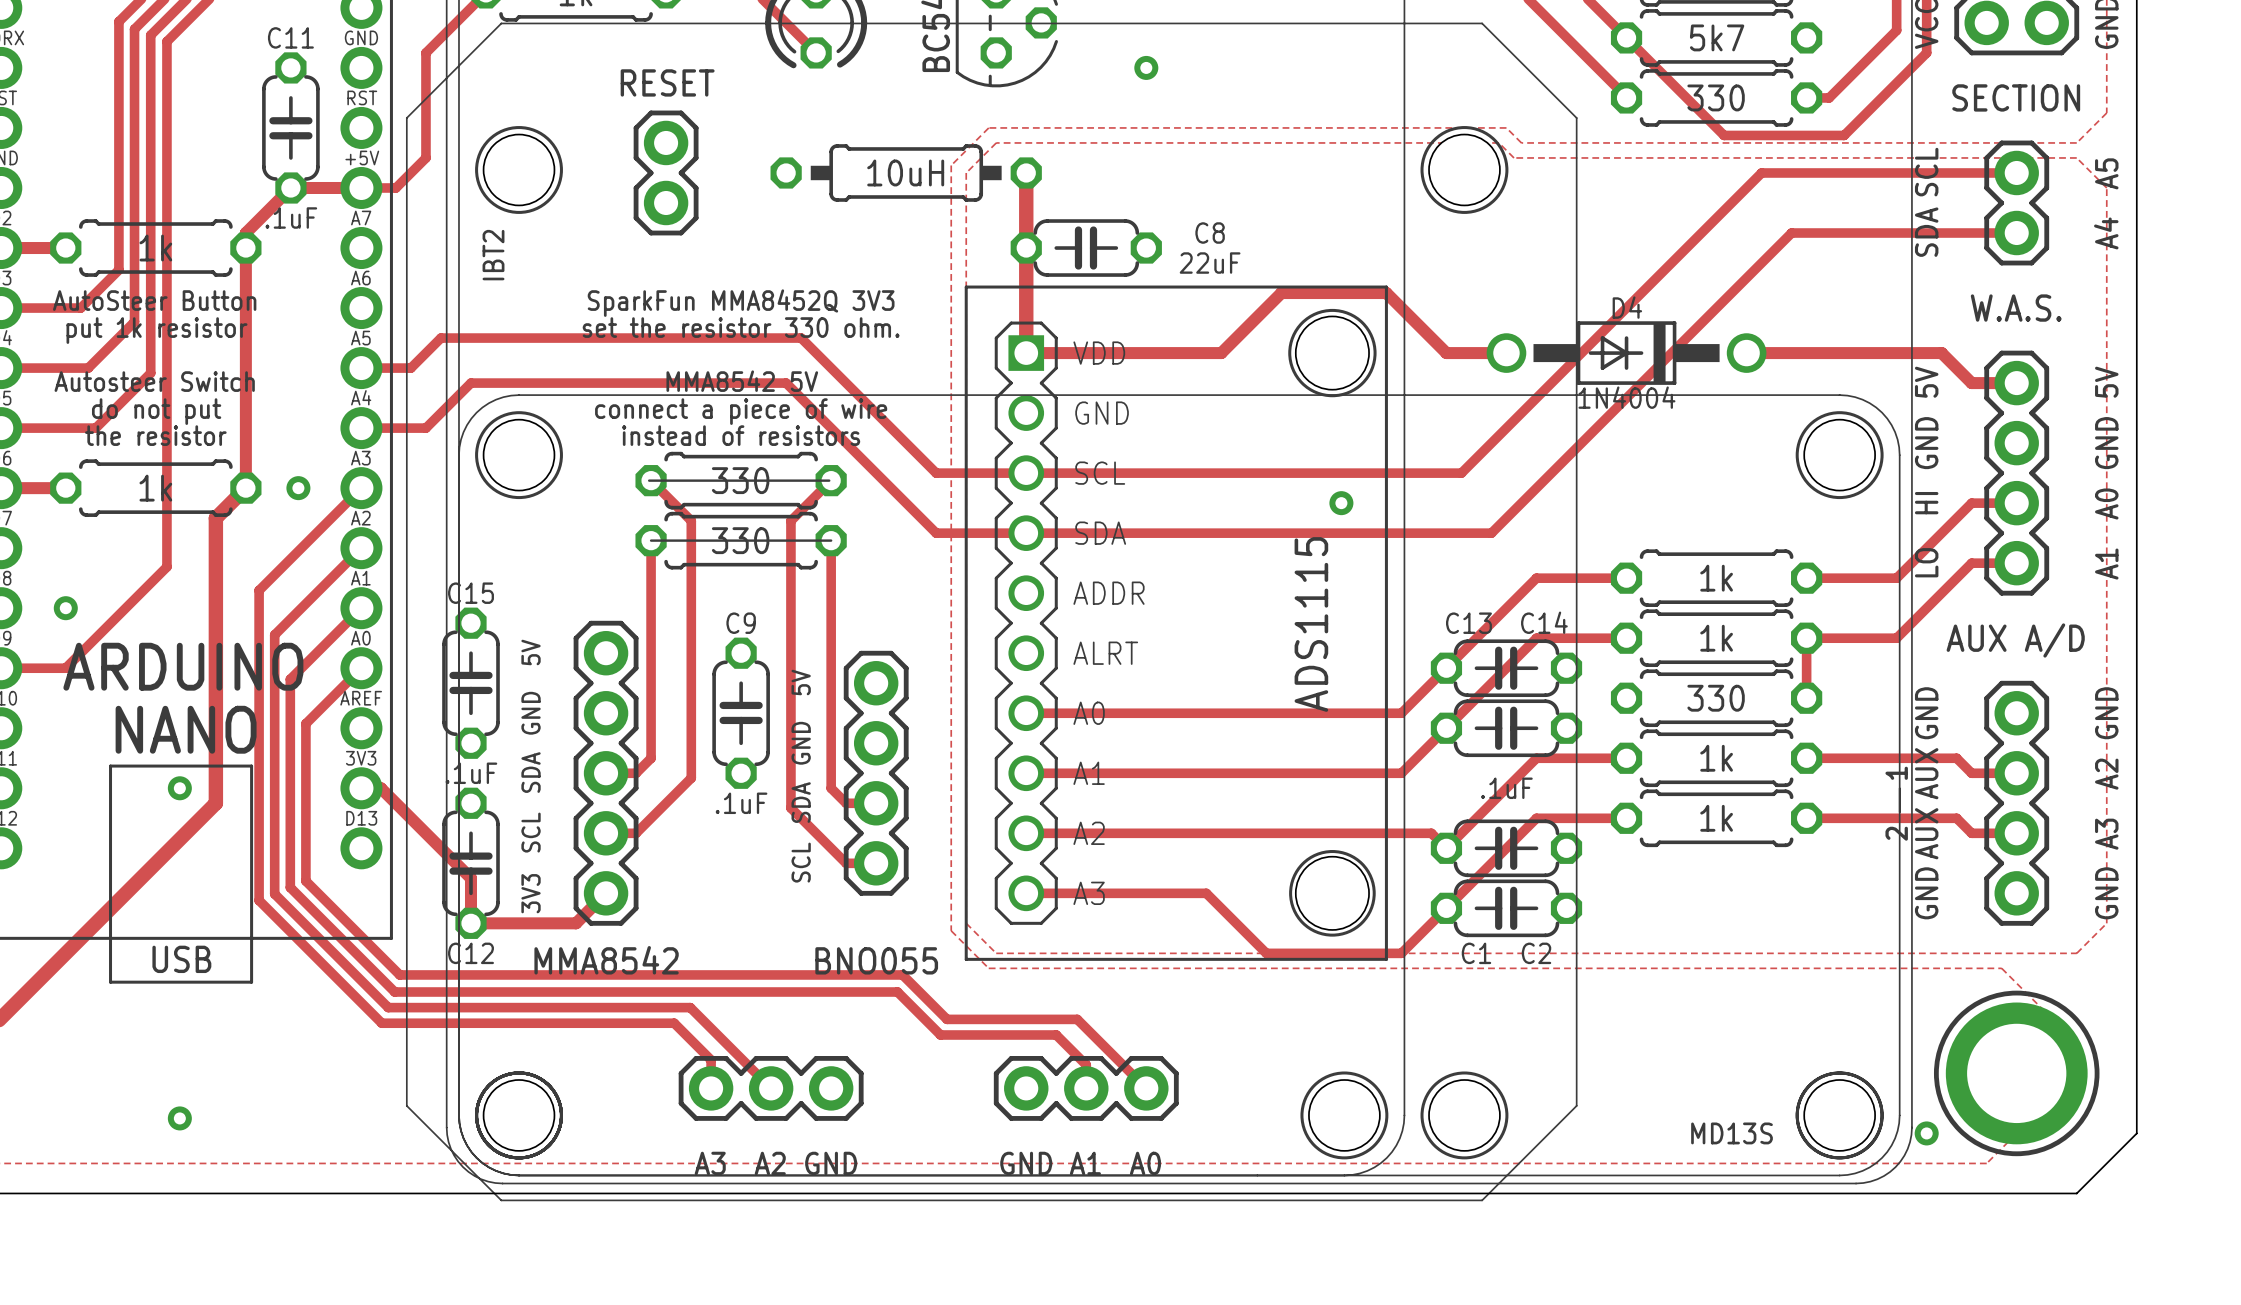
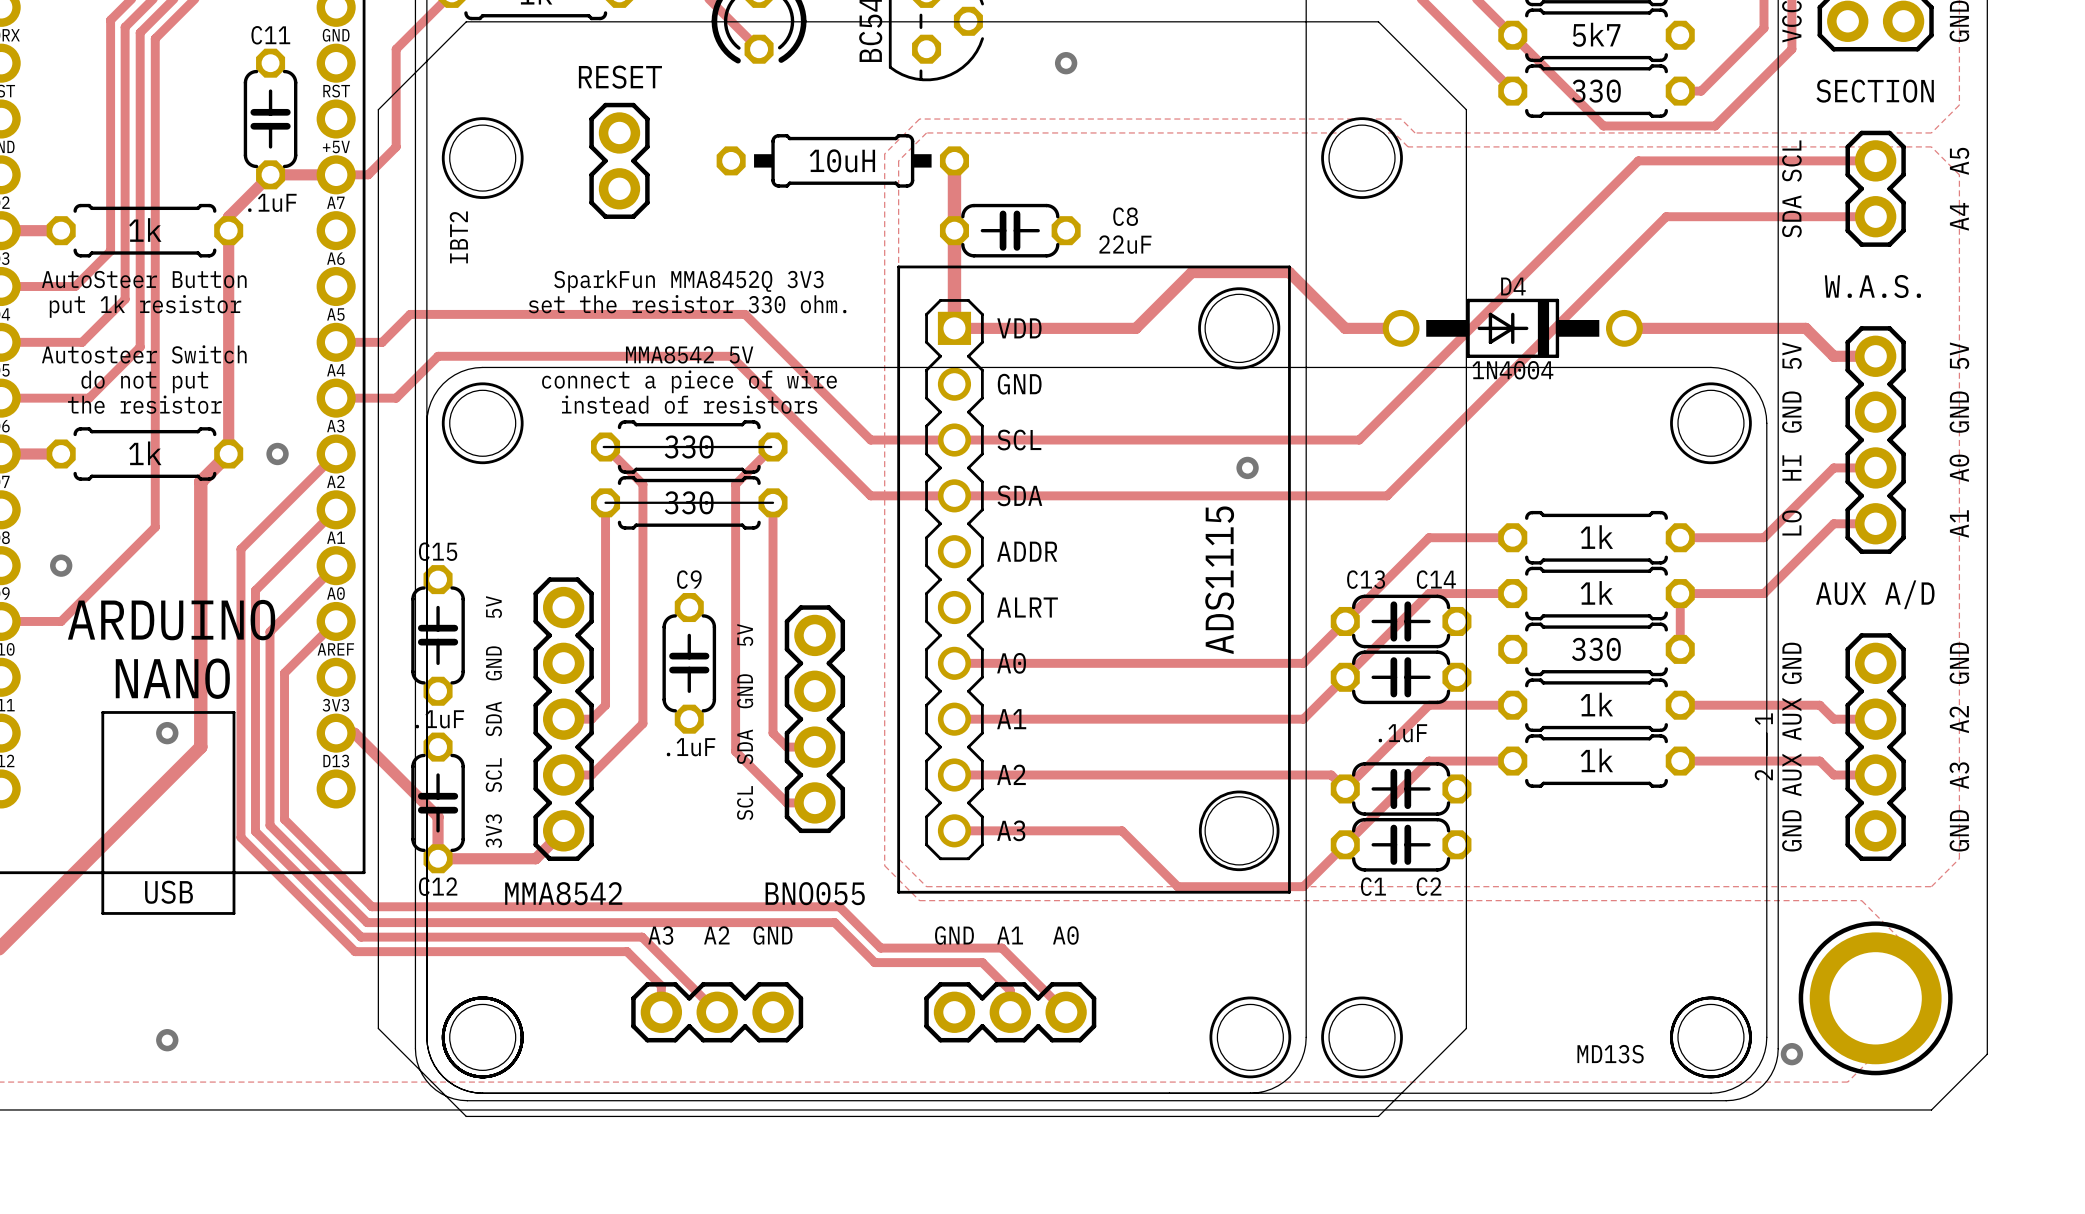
text: none -> GND (773, 935)
text: none -> GND (954, 935)
text position: A3 (710, 1163) -> A3 (660, 935)
text position: A2 (770, 1163) -> A2 (716, 935)
text: GND (831, 1163) -> none
text: GND (1026, 1163) -> none
text position: A1 (1085, 1163) -> A1 (1010, 935)
text position: A0 (1145, 1163) -> A0 (1065, 935)

